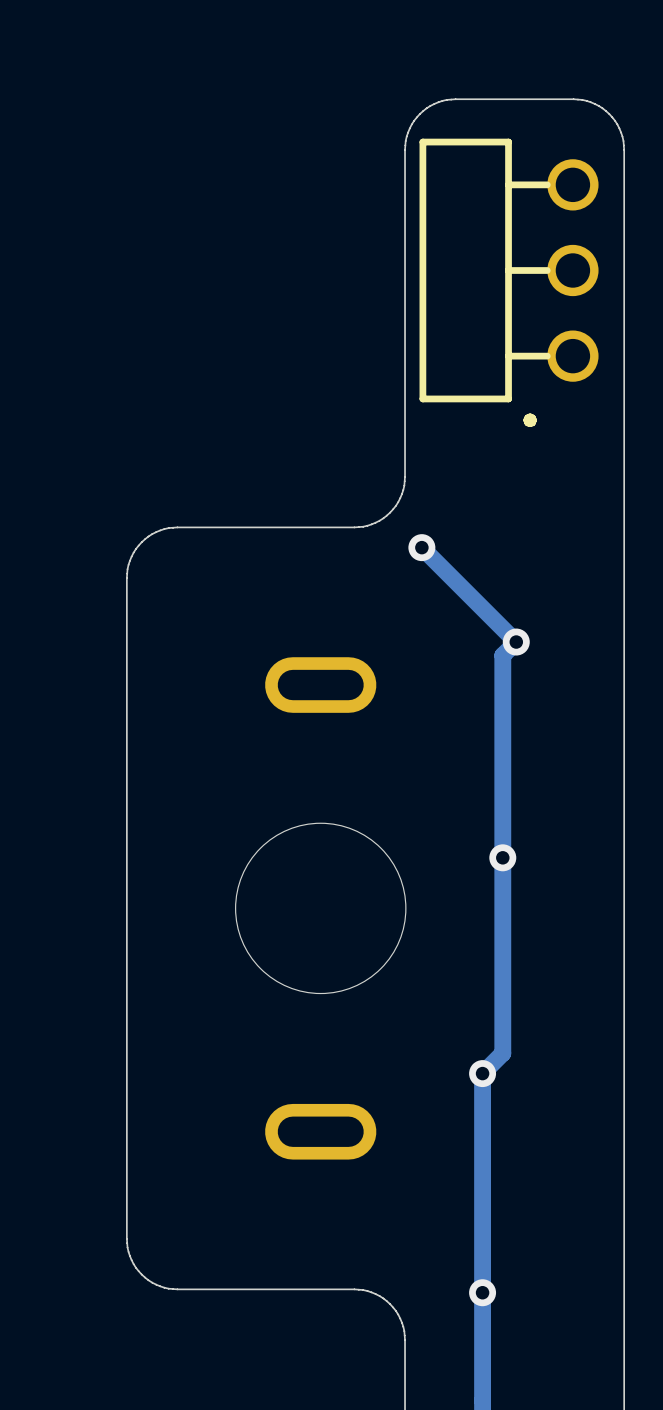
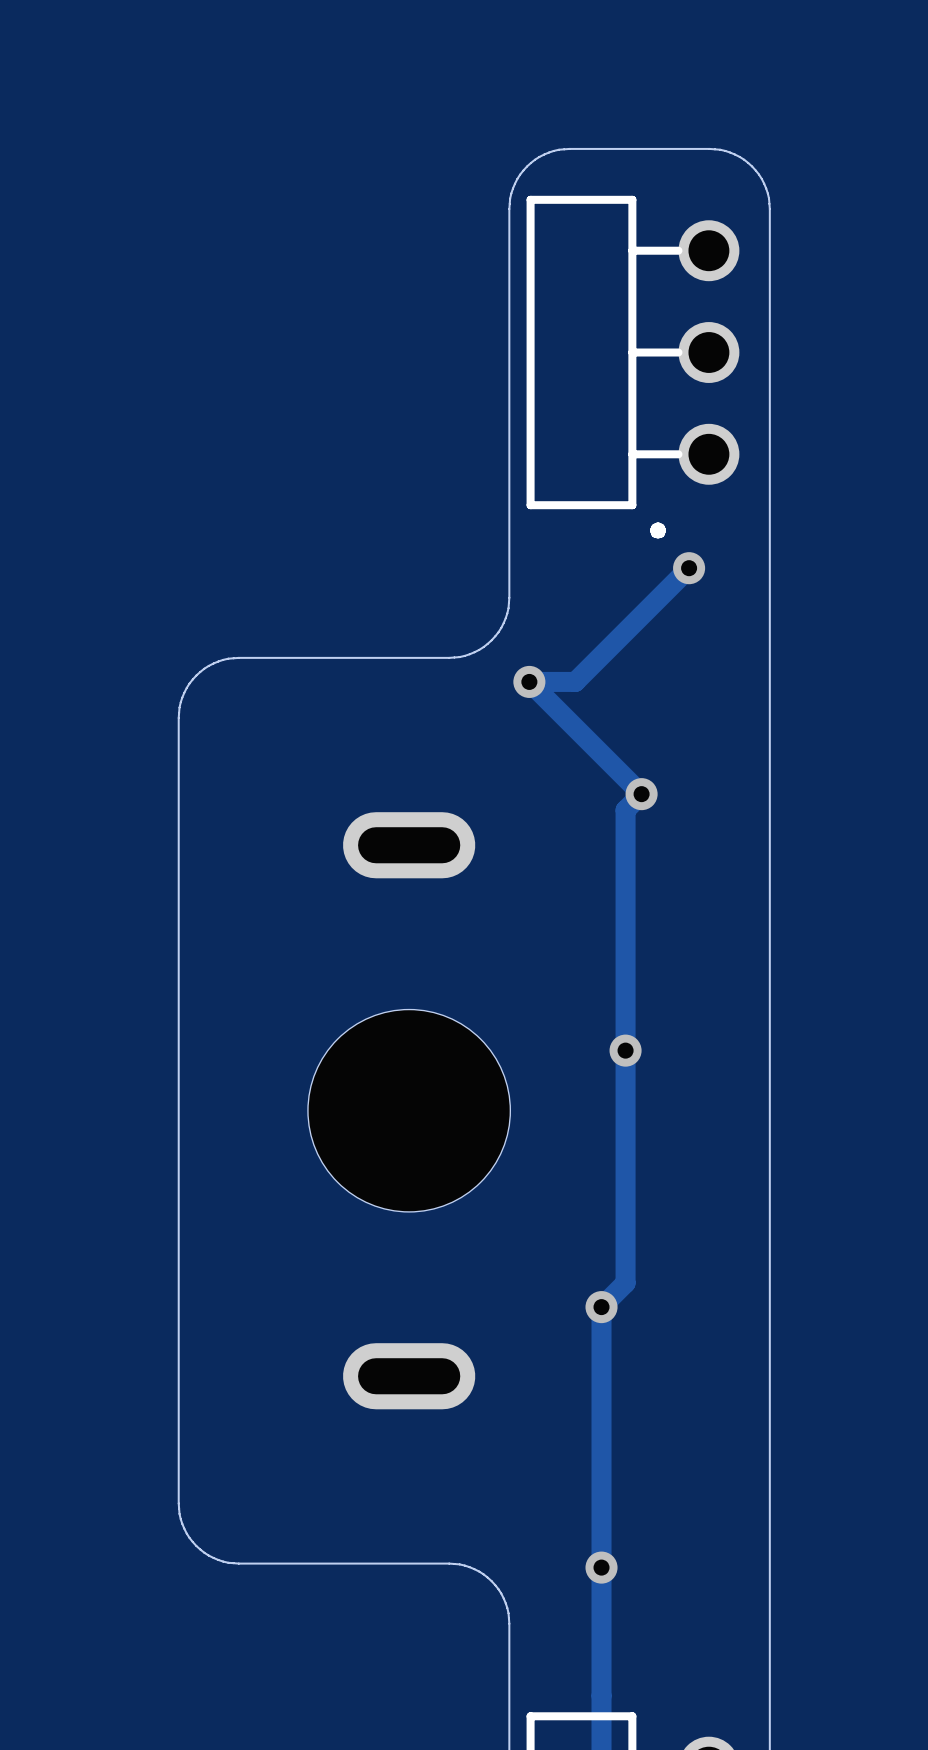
track: none -> (689, 568) (575, 681) (529, 681)
via: none -> (689, 568)

